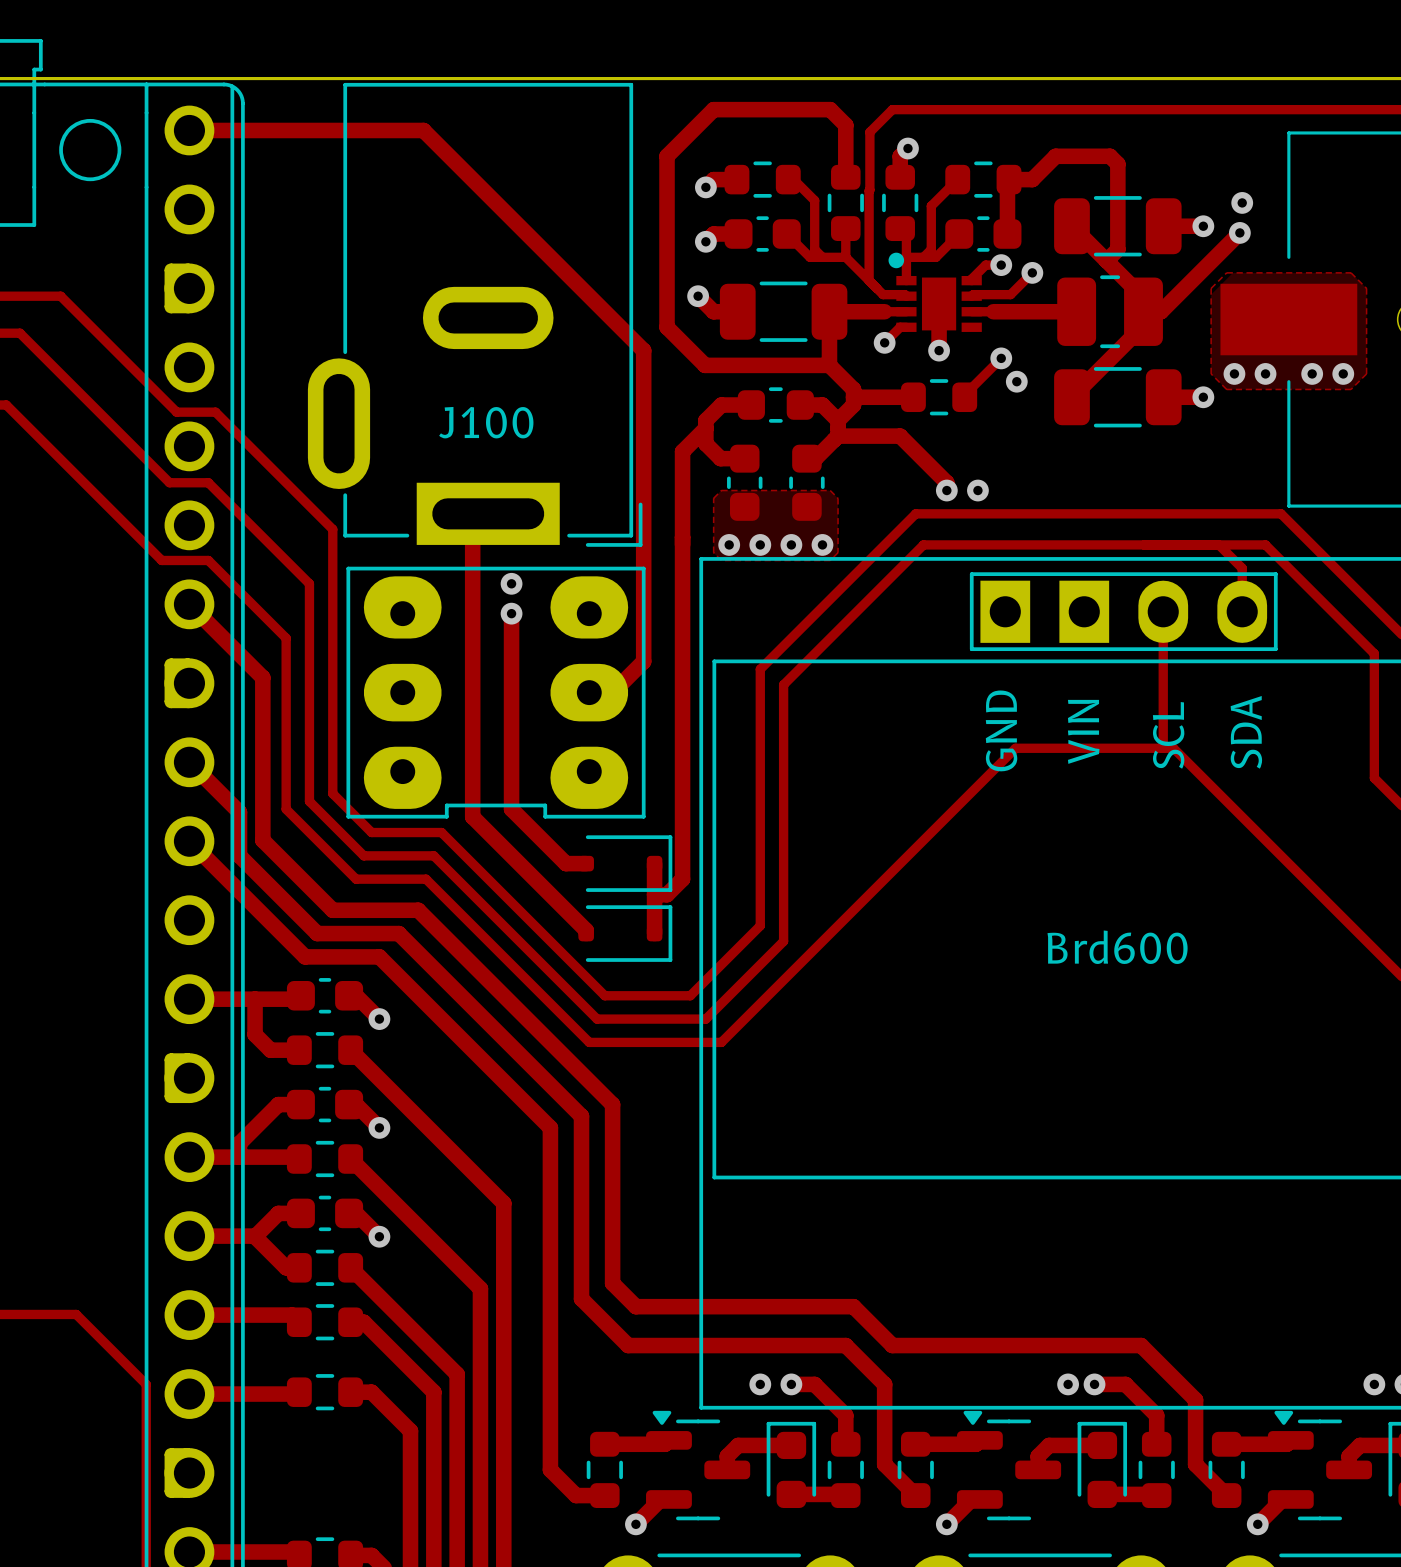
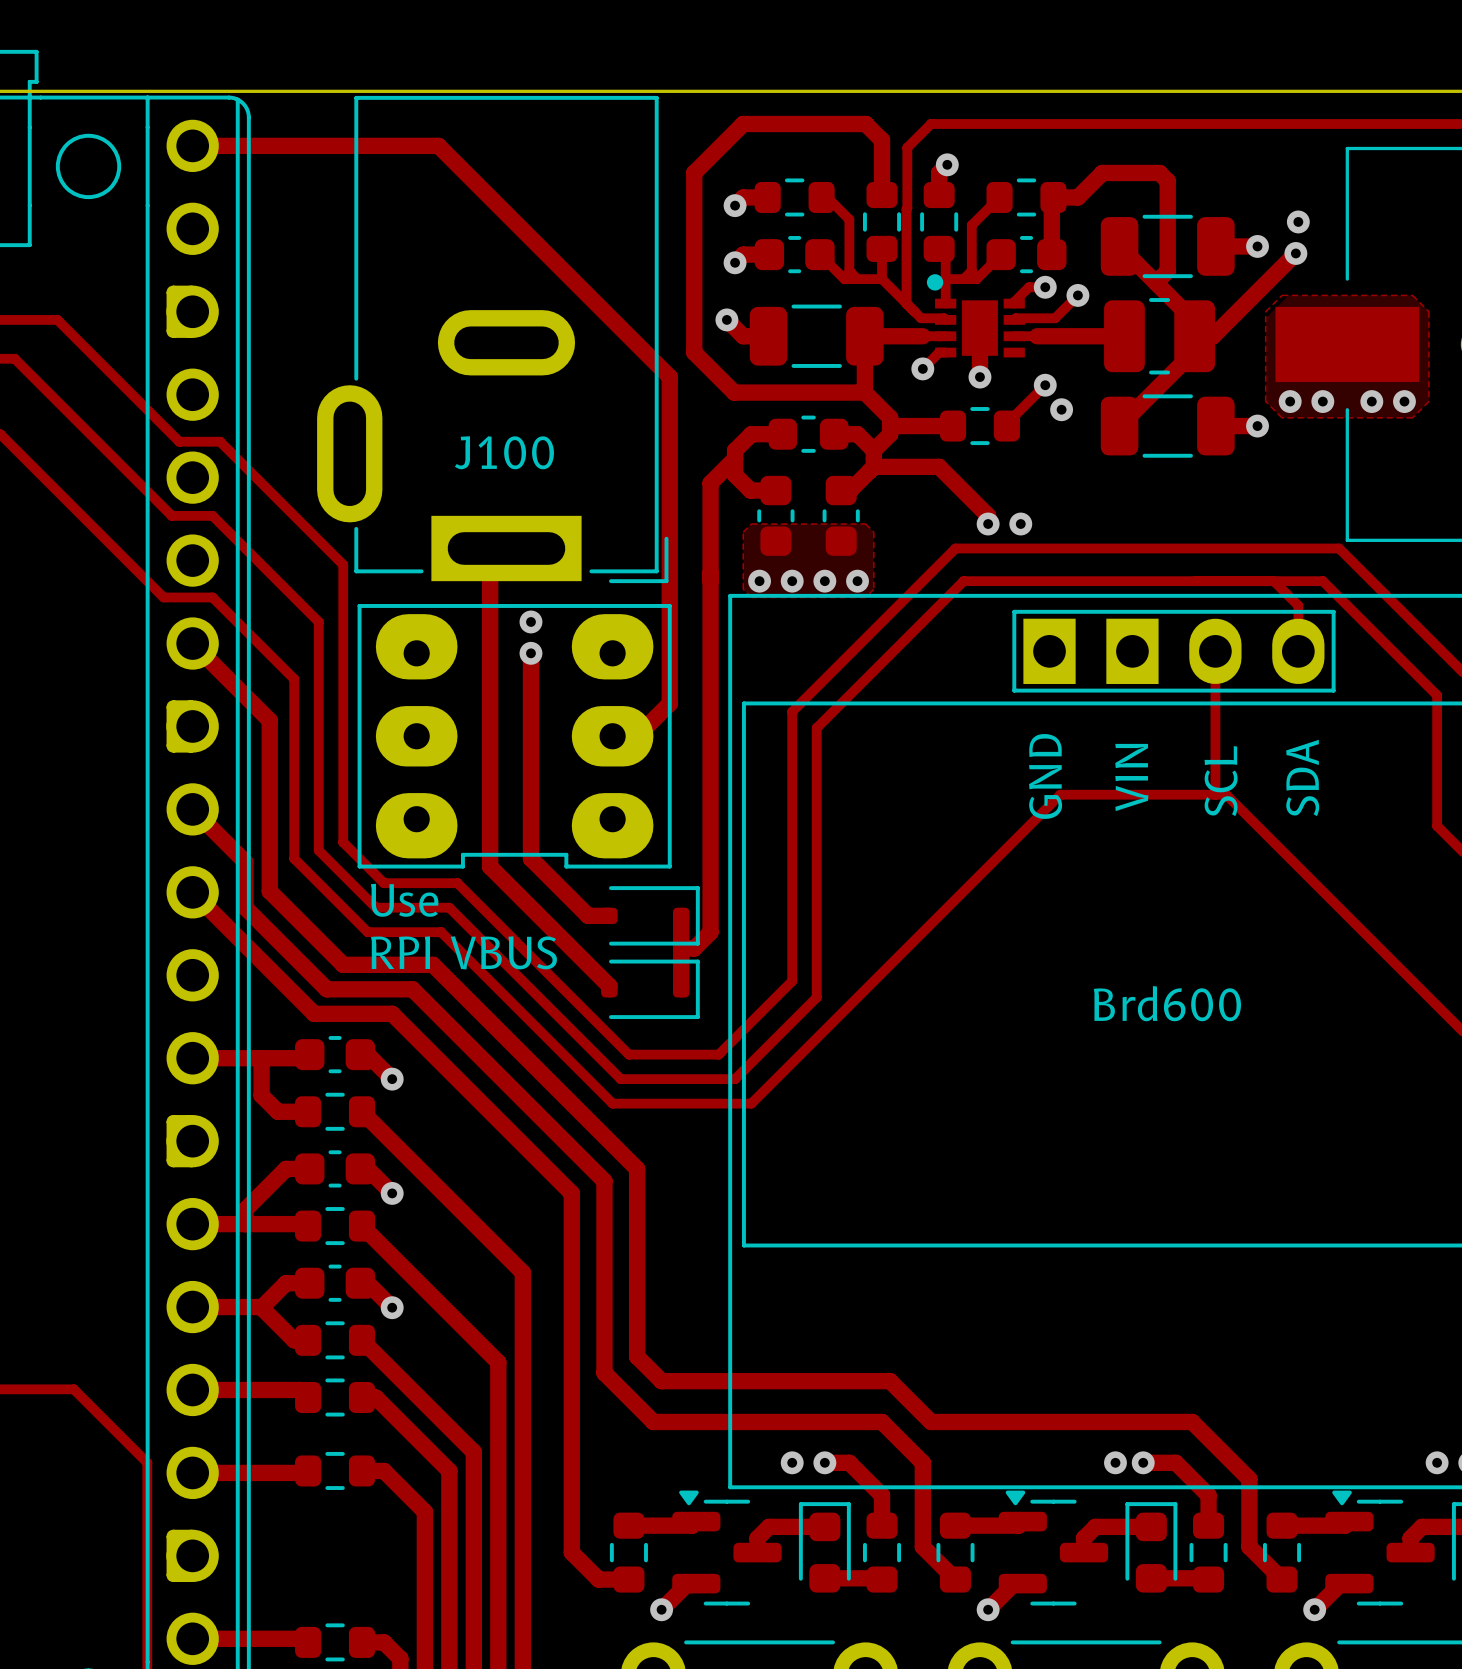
text: none -> Use (404, 900)
text: none -> RPI VBUS (463, 952)

